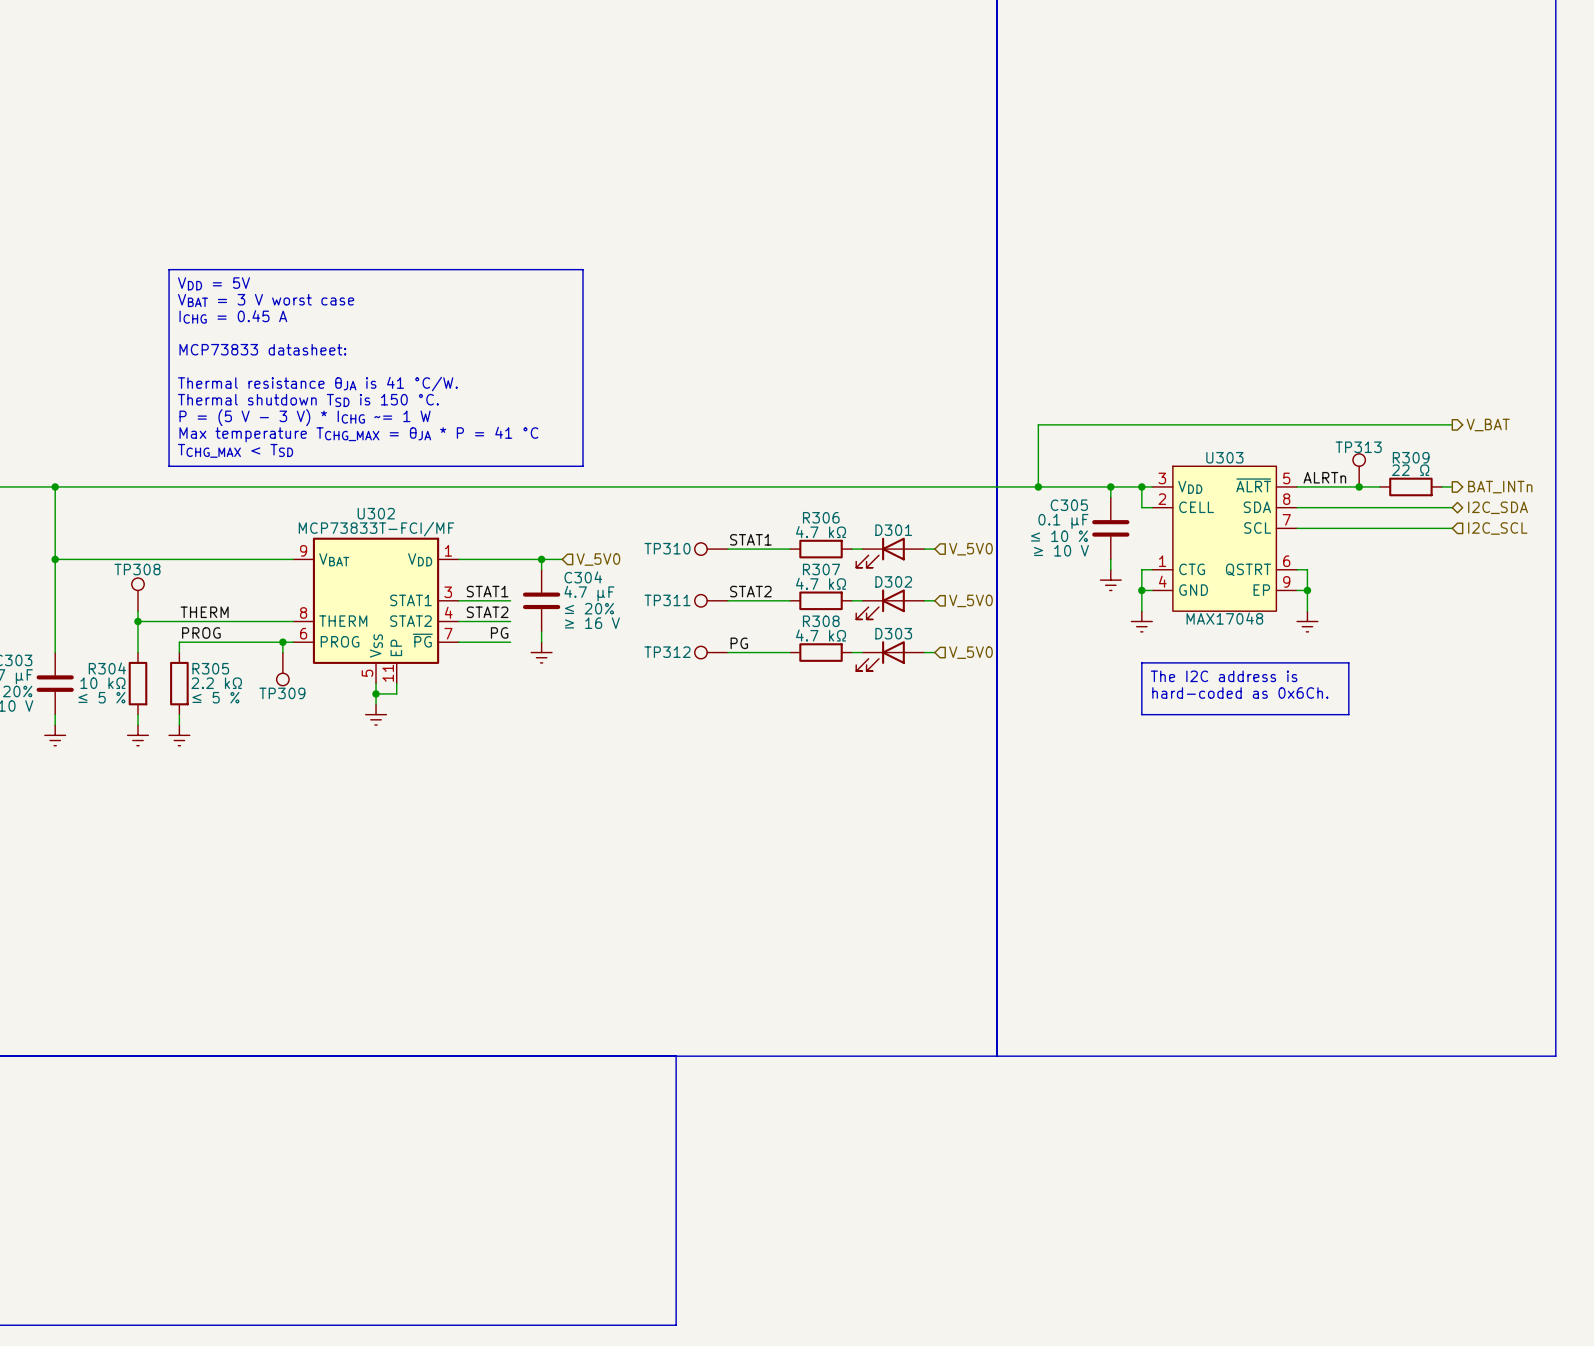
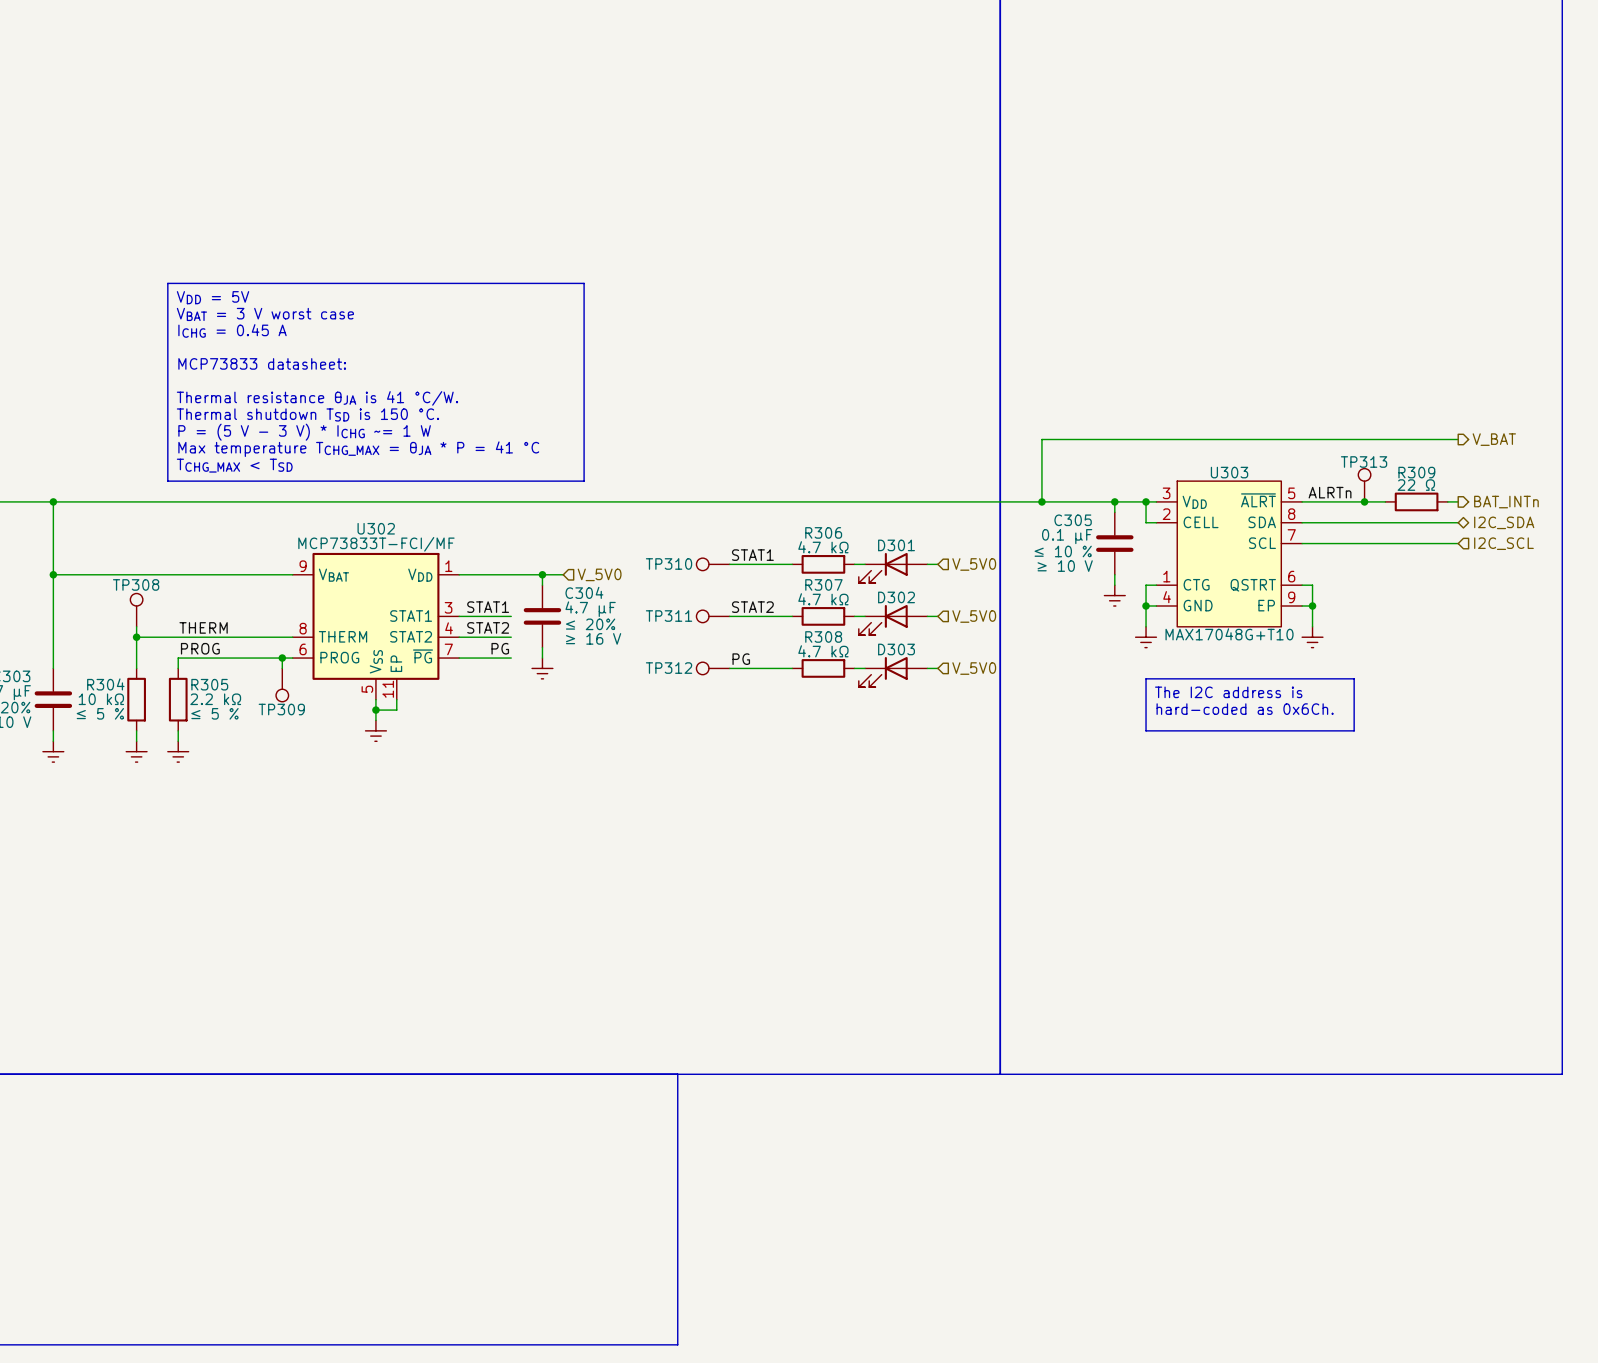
U303 value: MAX17048 (1224, 618) -> MAX17048G+T10 (1229, 634)

